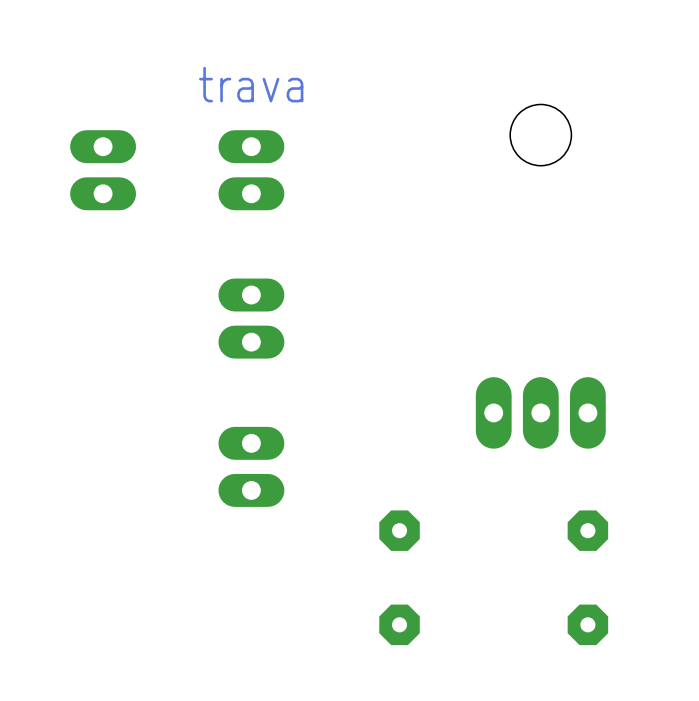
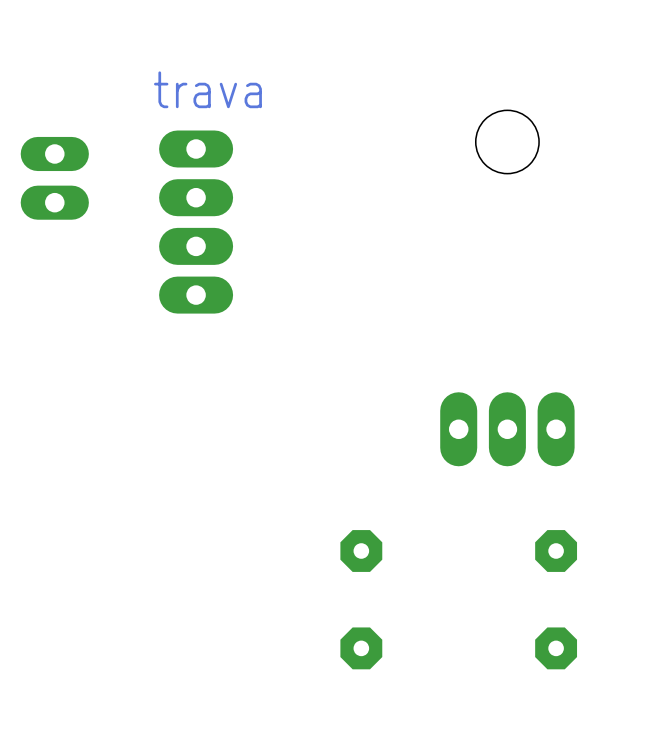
part: (251, 170) -> none
part: none -> (196, 222)
part: (251, 318) -> none
part: (251, 466) -> none

